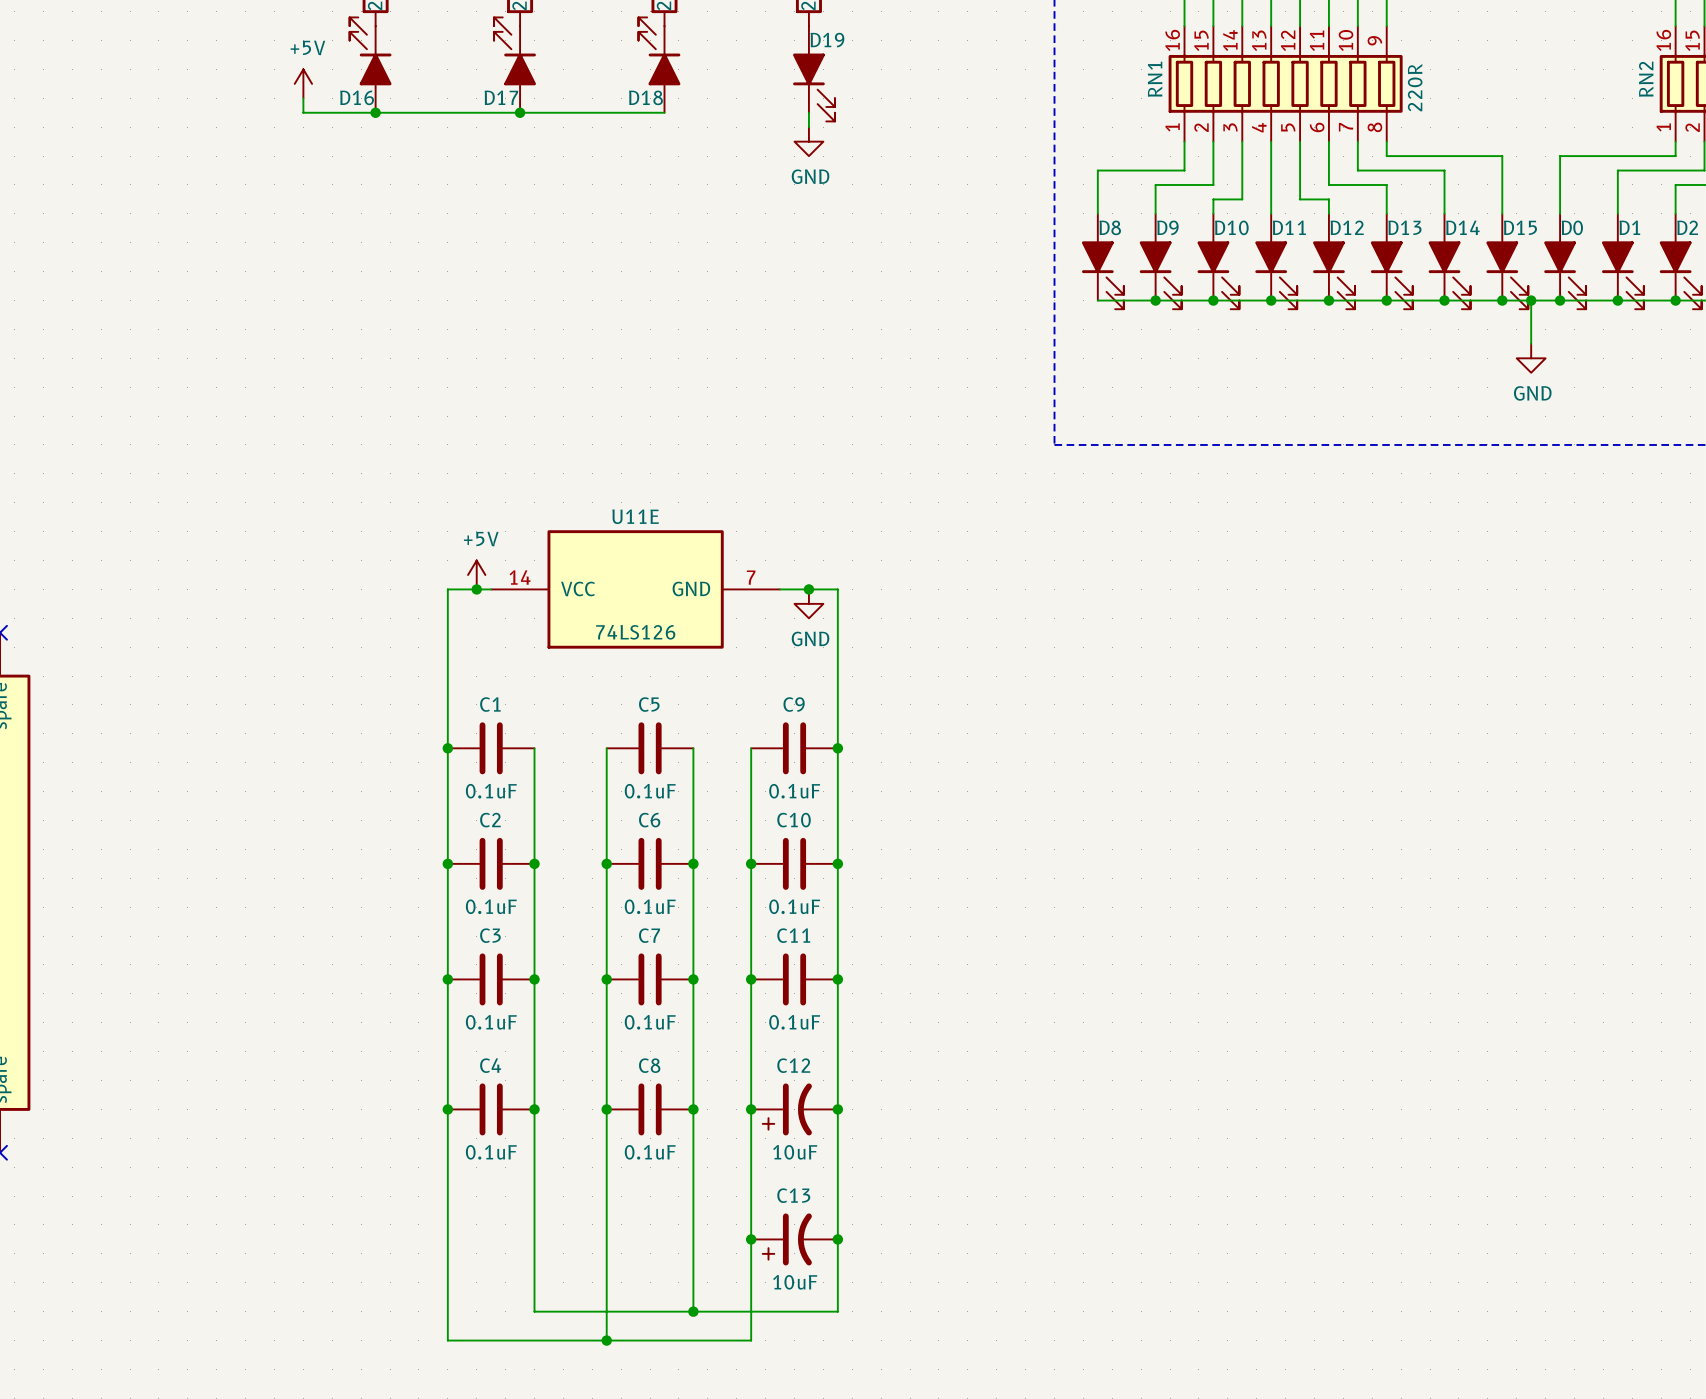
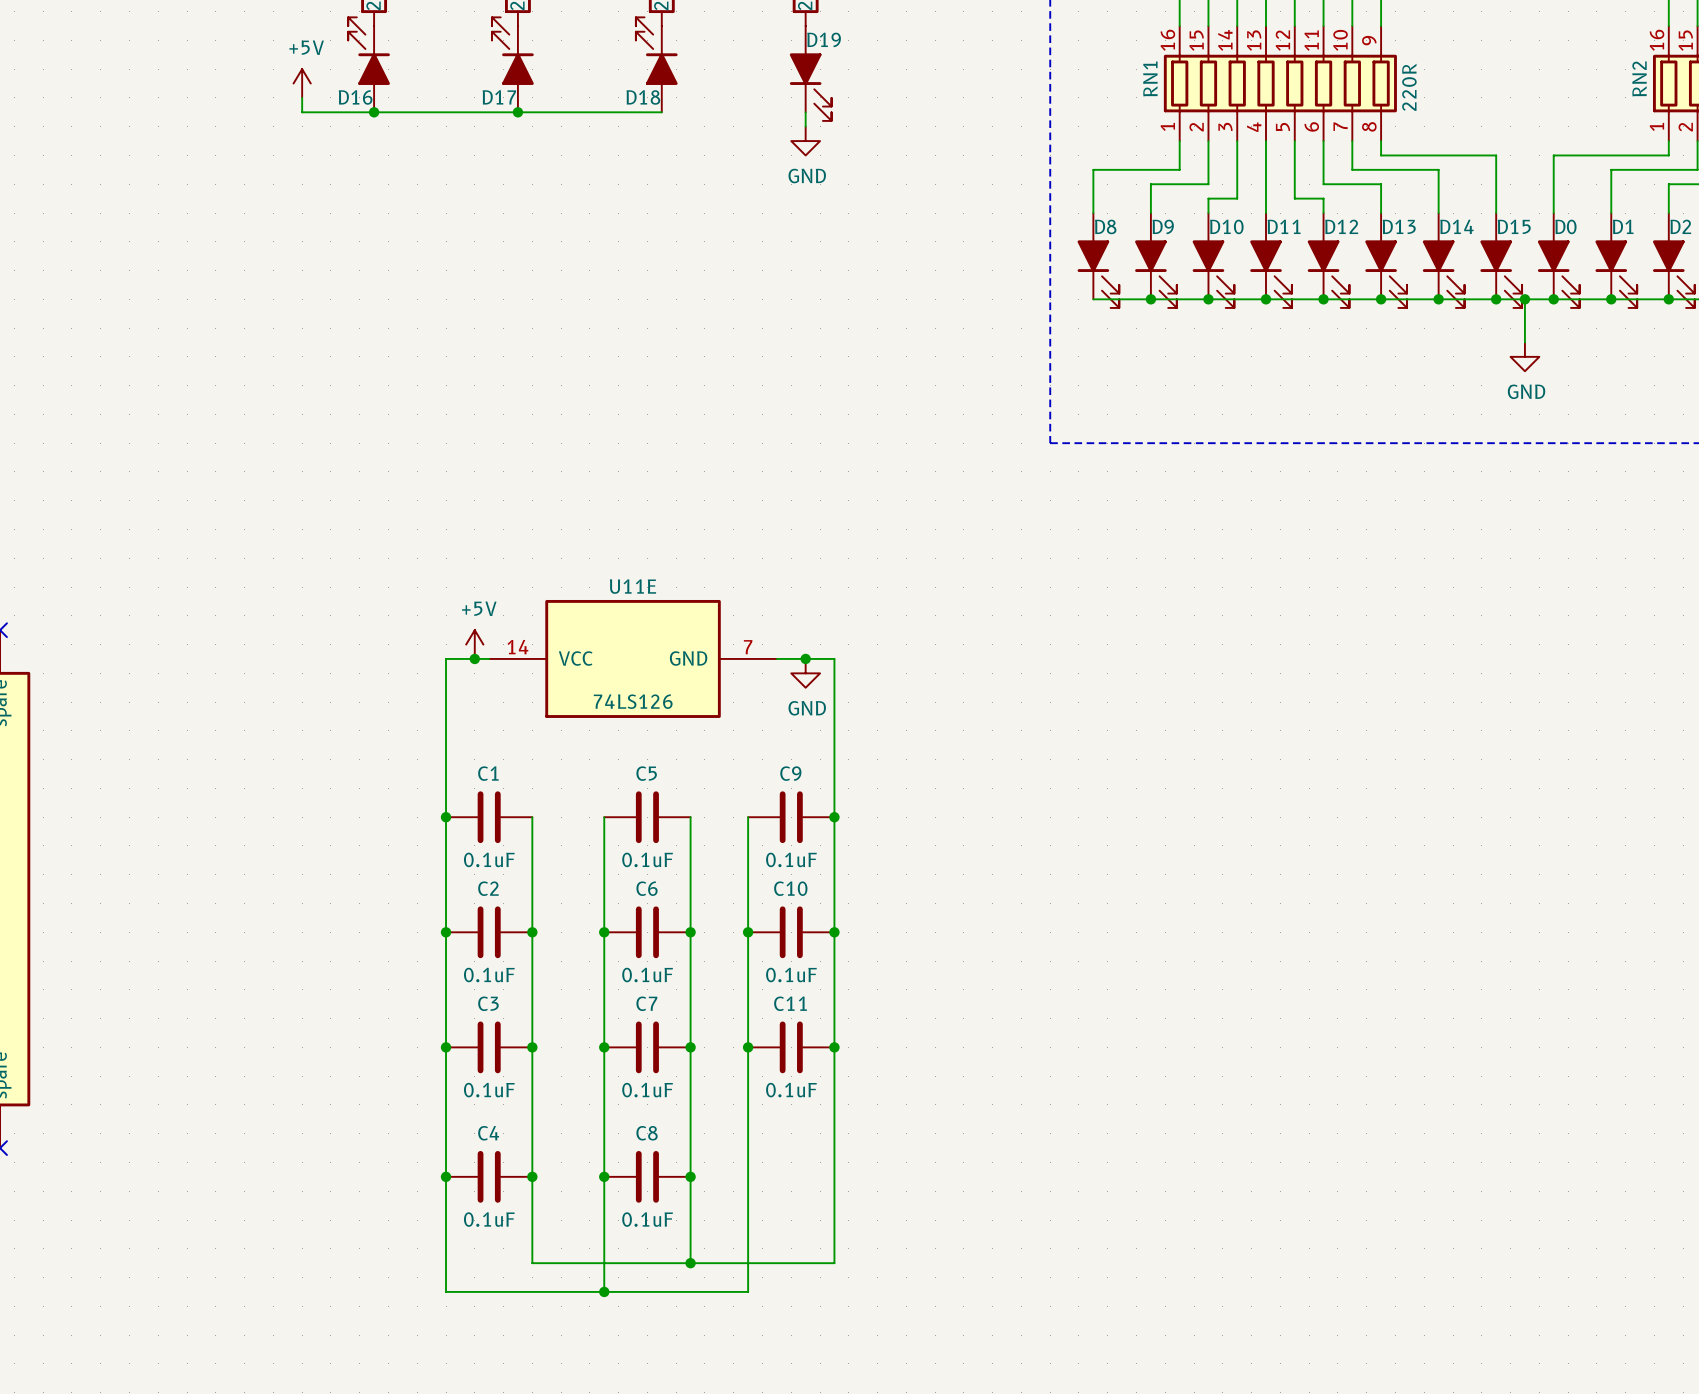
power symbol position: +5V (476, 574) -> +5V (474, 644)
junction: (476, 589) -> none
wire: (491, 589) (447, 589) (447, 661) -> (489, 658) (446, 658)
U11E position: (635, 589) -> (633, 658)
wire: (780, 589) (837, 589) (837, 661) -> (776, 658) (834, 658)
junction: (808, 589) -> none
power symbol position: GND (808, 603) -> GND (805, 673)
junction: none -> (474, 658)
junction: none -> (805, 658)
junction: (447, 748) -> none
C1 position: (491, 748) -> (489, 817)
wire: (534, 748) (534, 820) -> none
wire: (606, 748) (606, 820) -> none
C5 position: (650, 748) -> (647, 817)
wire: (693, 748) (693, 820) -> none
wire: (751, 748) (751, 820) -> none
C9 position: (794, 748) -> (791, 817)
junction: (837, 748) -> none
junction: none -> (446, 817)
junction: none -> (834, 817)
junction: (447, 863) -> none
C2 position: (491, 863) -> (489, 932)
junction: (534, 863) -> none
junction: (606, 863) -> none
C6 position: (650, 863) -> (647, 932)
junction: (693, 863) -> none
junction: (751, 863) -> none
C10 position: (794, 863) -> (791, 932)
junction: (837, 863) -> none
junction: none -> (446, 932)
junction: none -> (532, 932)
junction: none -> (604, 932)
junction: none -> (690, 932)
junction: none -> (748, 932)
junction: none -> (834, 932)
junction: (447, 979) -> none
C3 position: (491, 979) -> (489, 1047)
junction: (534, 979) -> none
junction: (606, 979) -> none
C7 position: (650, 979) -> (647, 1047)
junction: (693, 979) -> none
junction: (751, 979) -> none
C11 position: (794, 979) -> (791, 1047)
junction: (837, 979) -> none
junction: none -> (446, 1047)
junction: none -> (532, 1047)
junction: none -> (604, 1047)
junction: none -> (690, 1047)
junction: none -> (748, 1047)
junction: none -> (834, 1047)
junction: (447, 1109) -> none
C4 position: (491, 1109) -> (489, 1176)
junction: (534, 1109) -> none
junction: (606, 1109) -> none
C8 position: (650, 1109) -> (647, 1176)
junction: (693, 1109) -> none
junction: (751, 1109) -> none
C12: 10uF (794, 1109) -> none
junction: (837, 1109) -> none
junction: none -> (446, 1176)
junction: none -> (532, 1176)
junction: none -> (604, 1176)
junction: none -> (690, 1176)
junction: (751, 1239) -> none
C13: 10uF (794, 1239) -> none
junction: (837, 1239) -> none
wire: (534, 1268) (534, 1311) (837, 1311) (837, 1268) -> (532, 1263) (834, 1263)
wire: (693, 1268) (693, 1311) -> none
junction: none -> (690, 1263)
wire: (447, 1297) (447, 1340) (751, 1340) (751, 1297) -> (446, 1291) (748, 1291)
wire: (606, 1297) (606, 1340) -> none
junction: (693, 1311) -> none
junction position: (606, 1340) -> (604, 1291)

